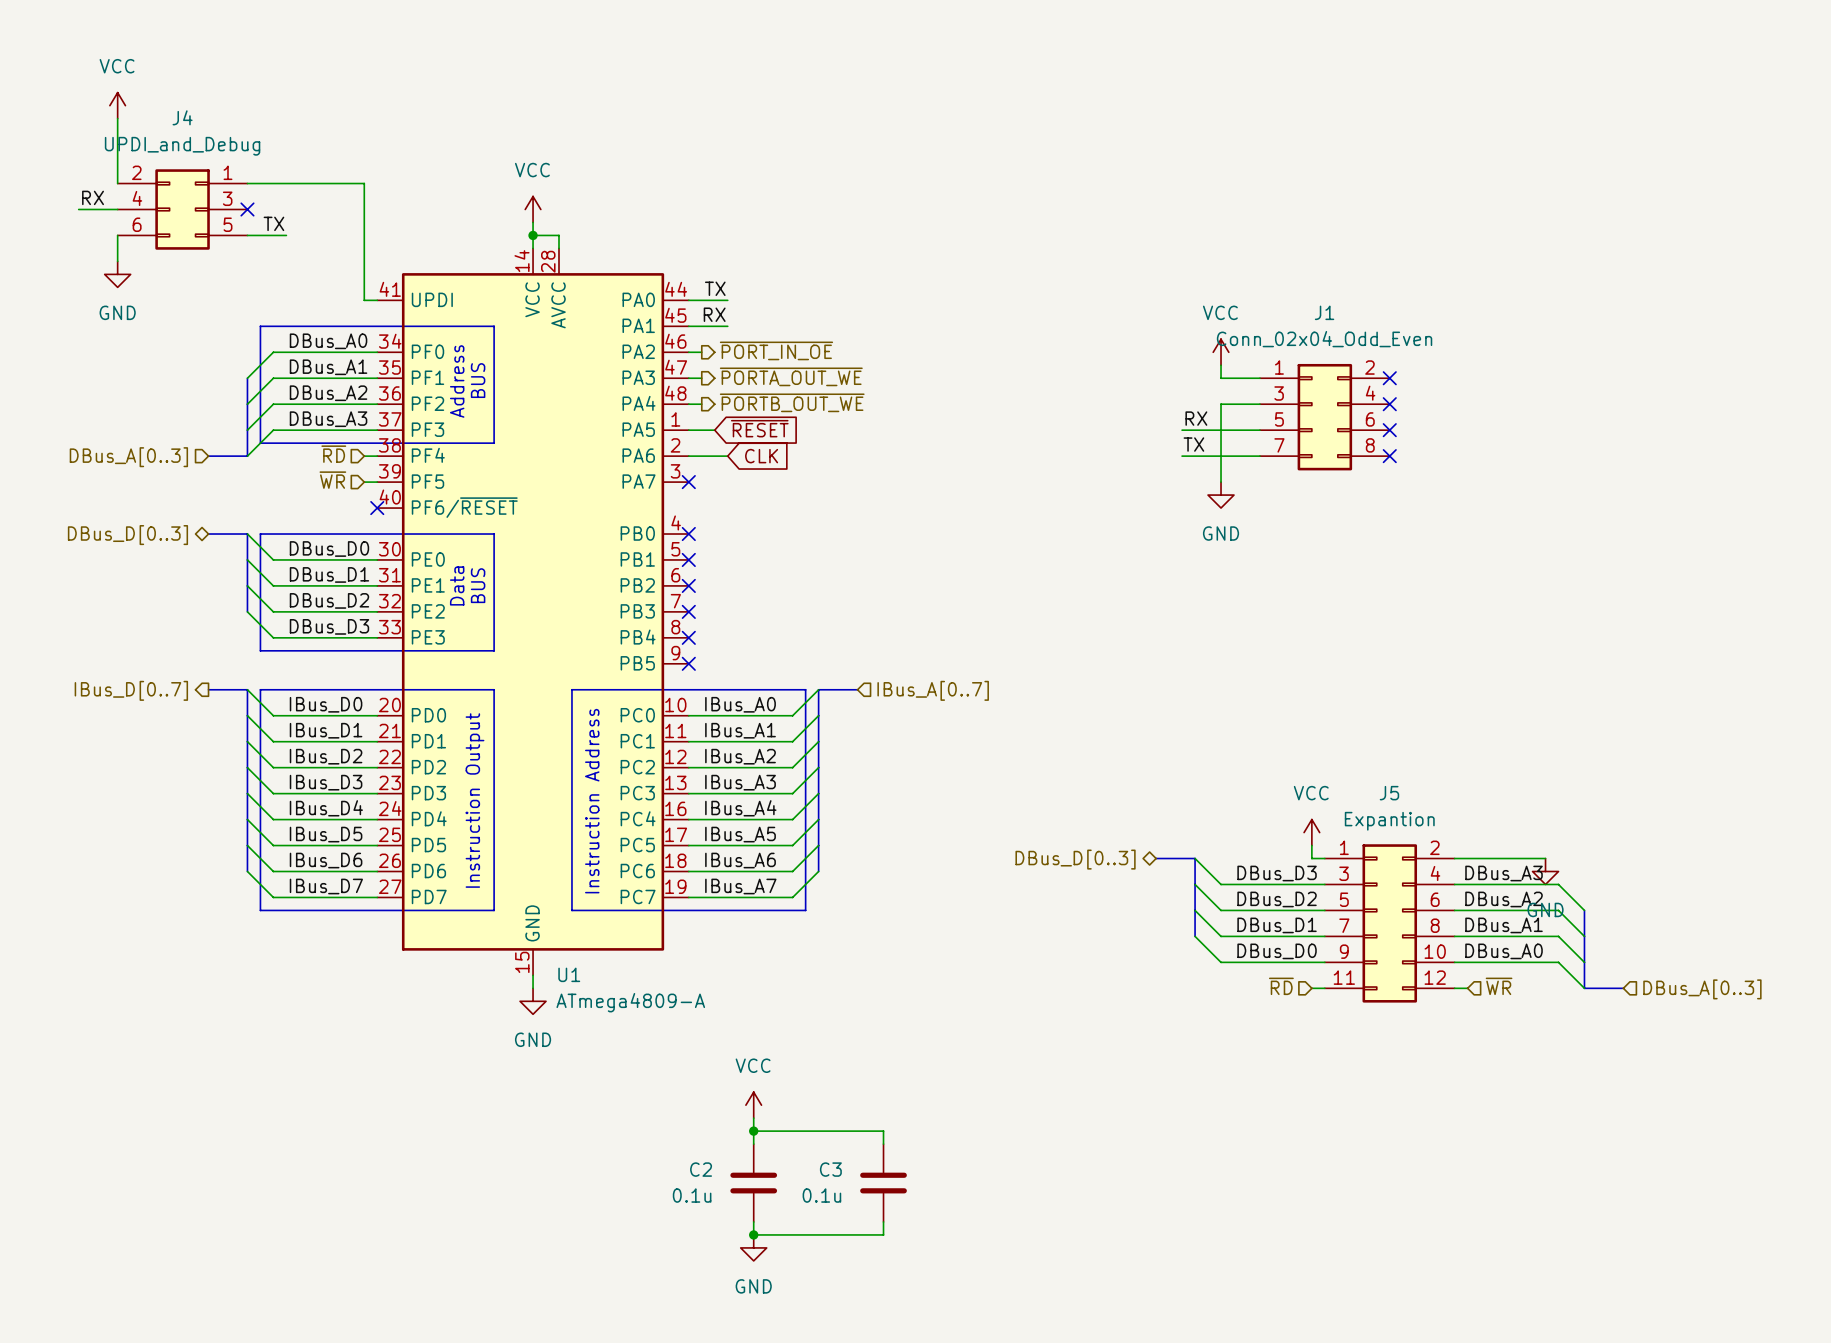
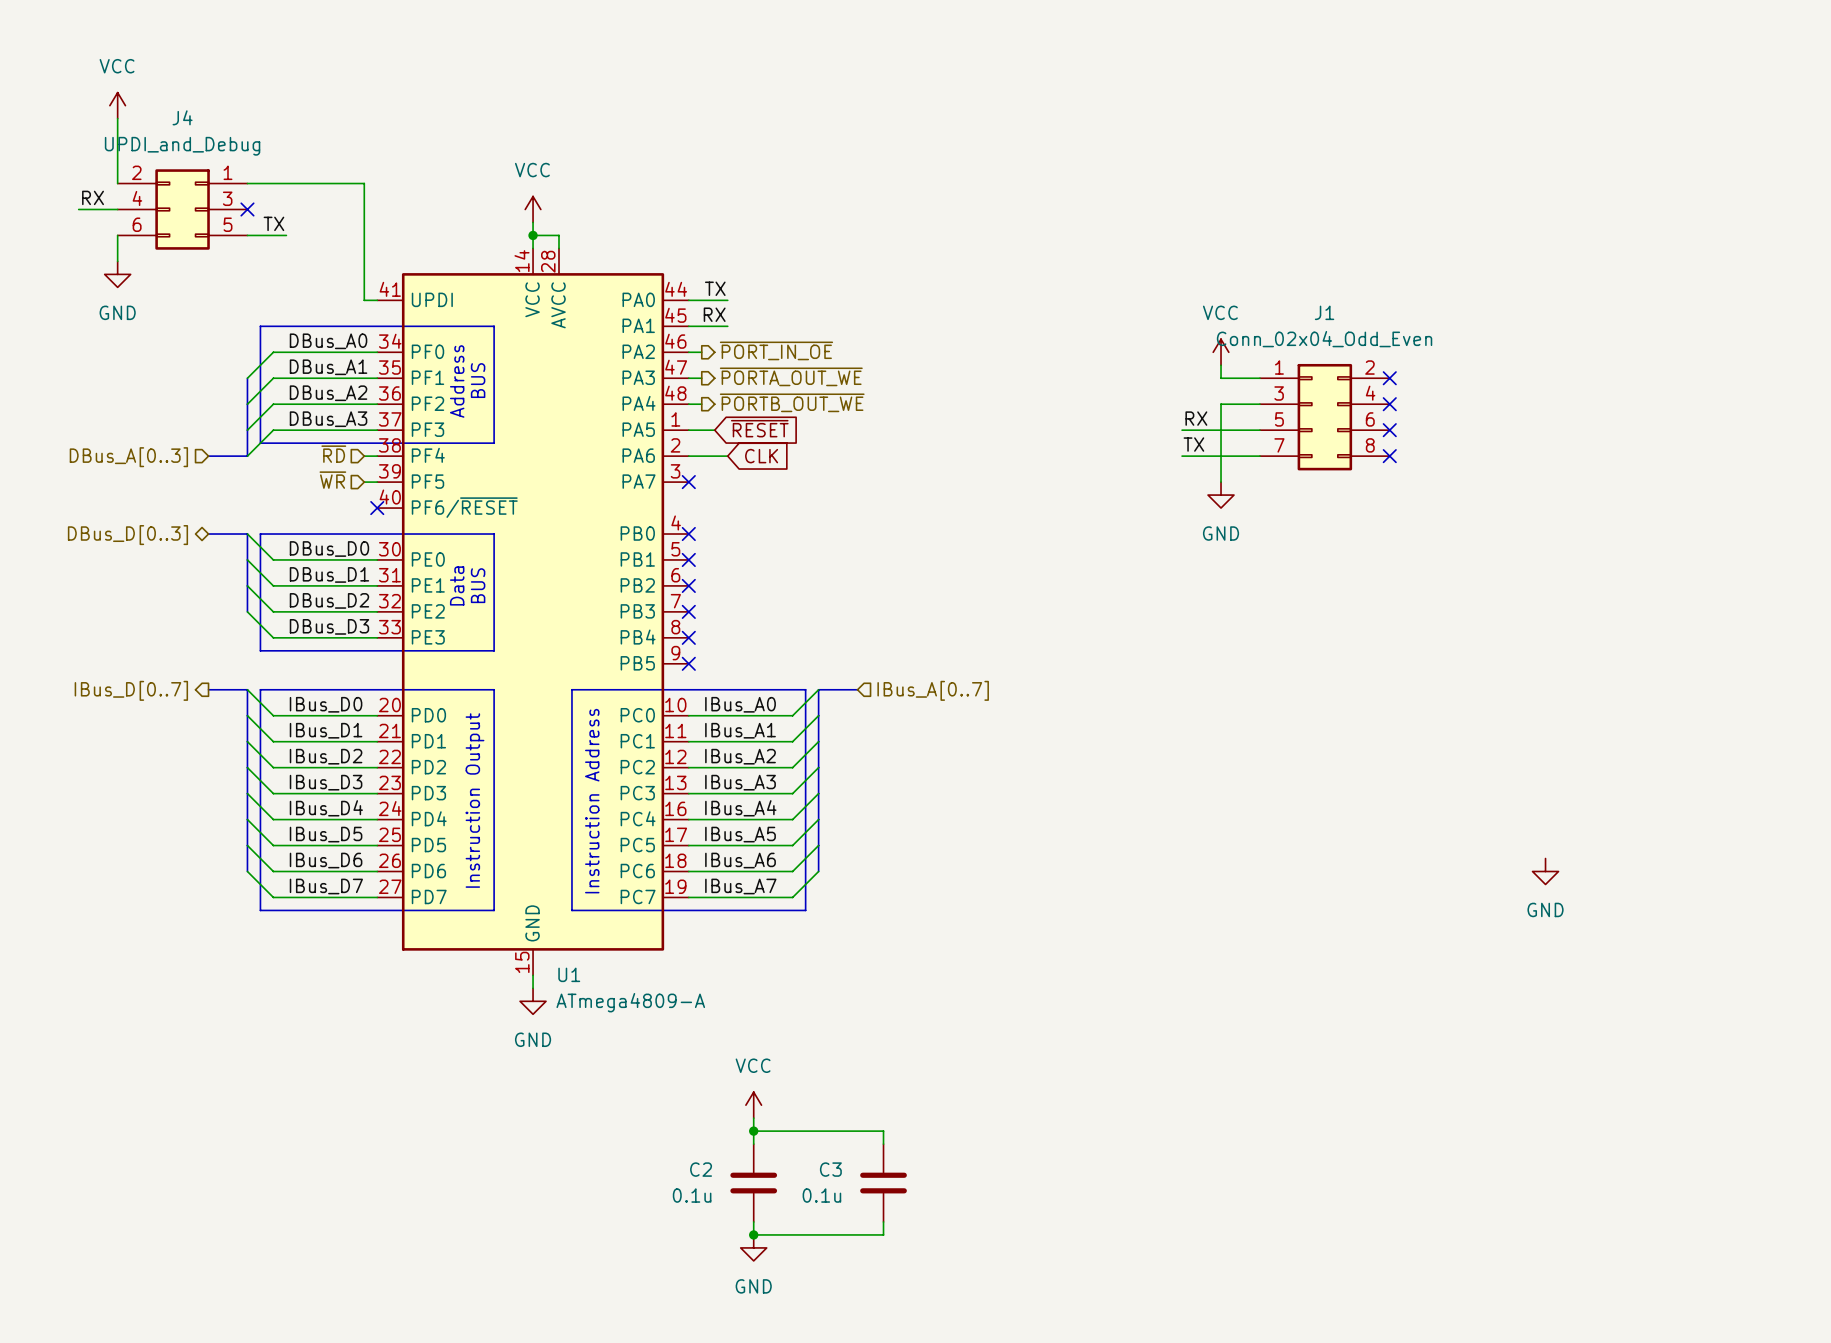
power symbol: VCC (1311, 832) -> none
wire: (1311, 845) (1311, 858) (1324, 858) -> none
bus: (1156, 858) (1195, 858) (1195, 936) -> none
wire: (1195, 858) (1221, 884) (1324, 884) -> none
wire: (1454, 858) (1545, 858) -> none
hierarchical label: DBus_D[0..3] (1075, 859) -> none
label: DBus_D3 (1277, 873) -> none
label: DBus_A3 (1504, 873) -> none
wire: (1195, 884) (1221, 910) (1324, 910) -> none
wire: (1454, 884) (1558, 884) (1584, 910) -> none
label: DBus_D2 (1277, 899) -> none
label: DBus_A2 (1504, 899) -> none
wire: (1195, 910) (1221, 936) (1324, 936) -> none
wire: (1454, 910) (1558, 910) (1584, 936) -> none
bus: (1584, 910) (1584, 988) (1623, 988) -> none
J5: Expantion (1389, 923) -> none
label: DBus_D1 (1277, 925) -> none
label: DBus_A1 (1504, 925) -> none
wire: (1195, 936) (1221, 962) (1324, 962) -> none
wire: (1454, 936) (1558, 936) (1584, 962) -> none
label: DBus_D0 (1277, 951) -> none
label: DBus_A0 (1504, 951) -> none
wire: (1454, 962) (1558, 962) (1584, 988) -> none
hierarchical label: ~{RD} (1281, 986) -> none
hierarchical label: ~{WR} (1499, 986) -> none
wire: (1311, 988) (1324, 988) -> none
wire: (1454, 988) (1467, 988) -> none
hierarchical label: DBus_A[0..3] (1702, 989) -> none

